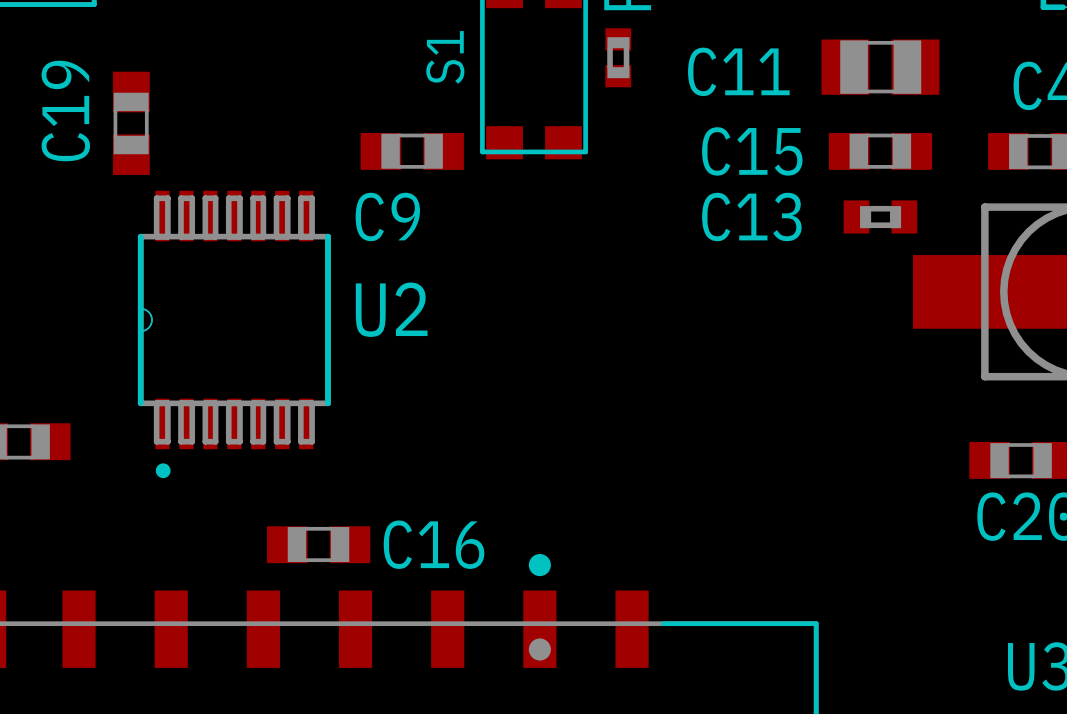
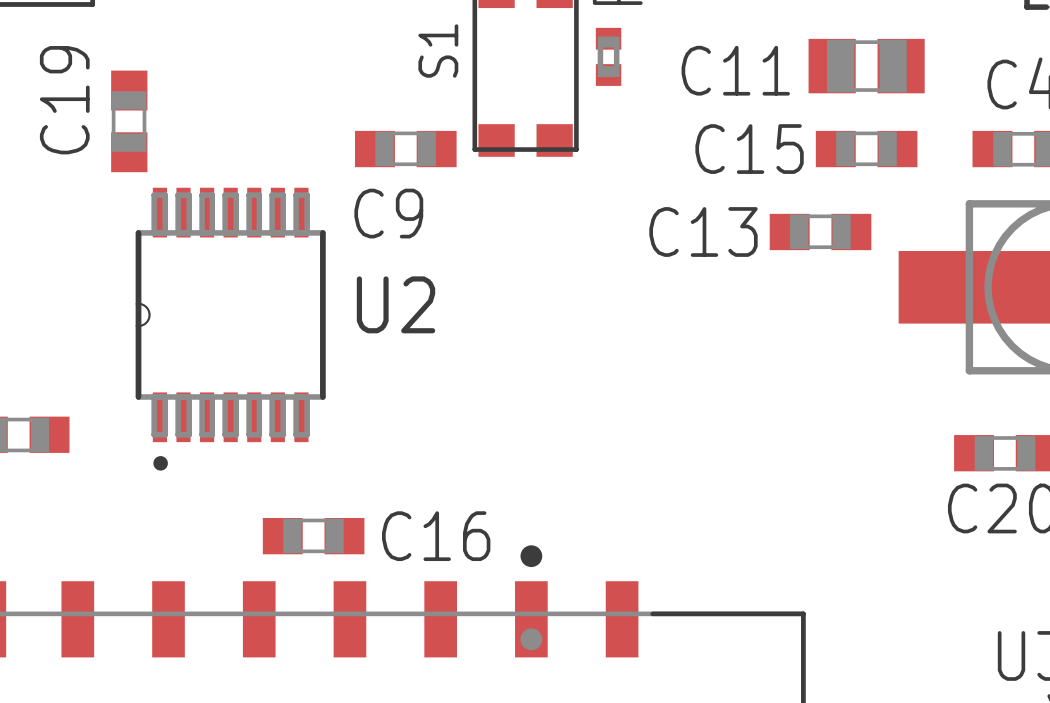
C13 footprint: [843, 200, 918, 234] -> [769, 213, 872, 251]

